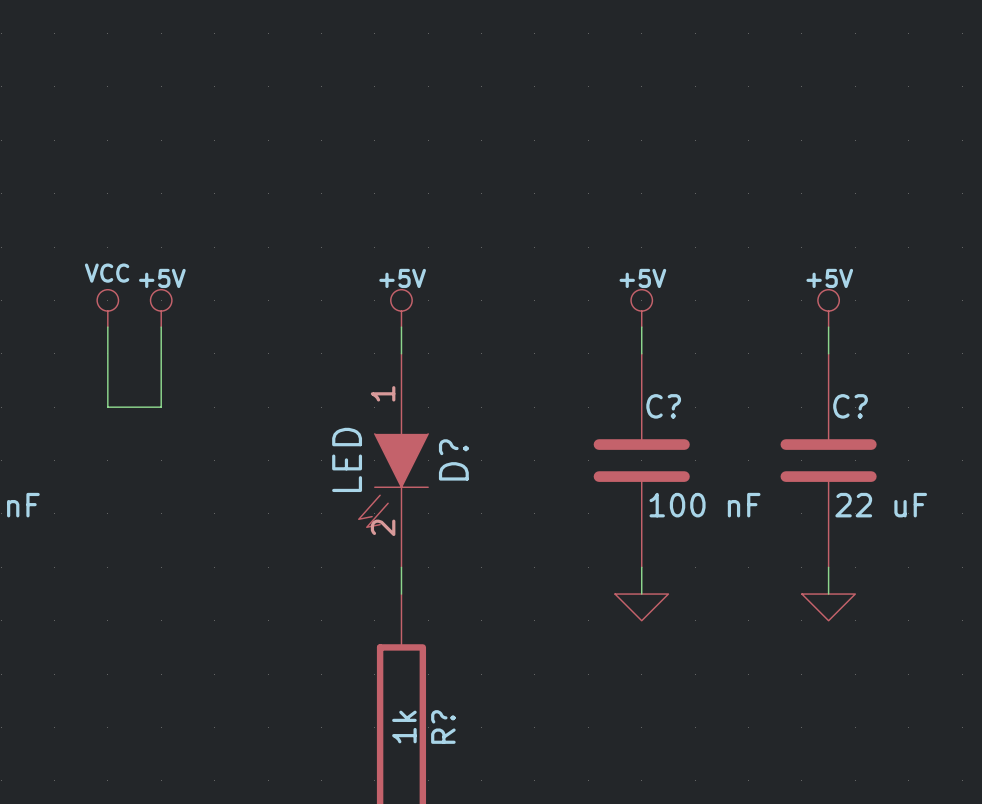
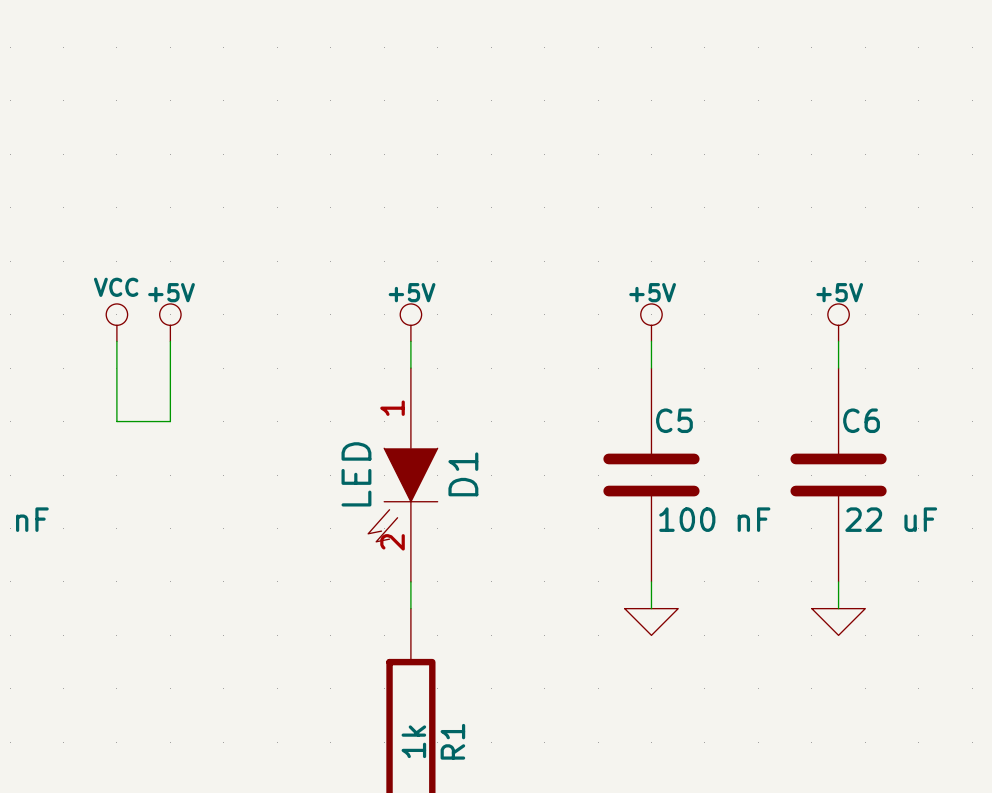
C? name: C? (663, 406) -> C5 (674, 420)
C? name: C? (850, 406) -> C6 (861, 420)
D? name: D? (453, 459) -> D1 (463, 474)
R? name: R? (443, 727) -> R1 (452, 741)

